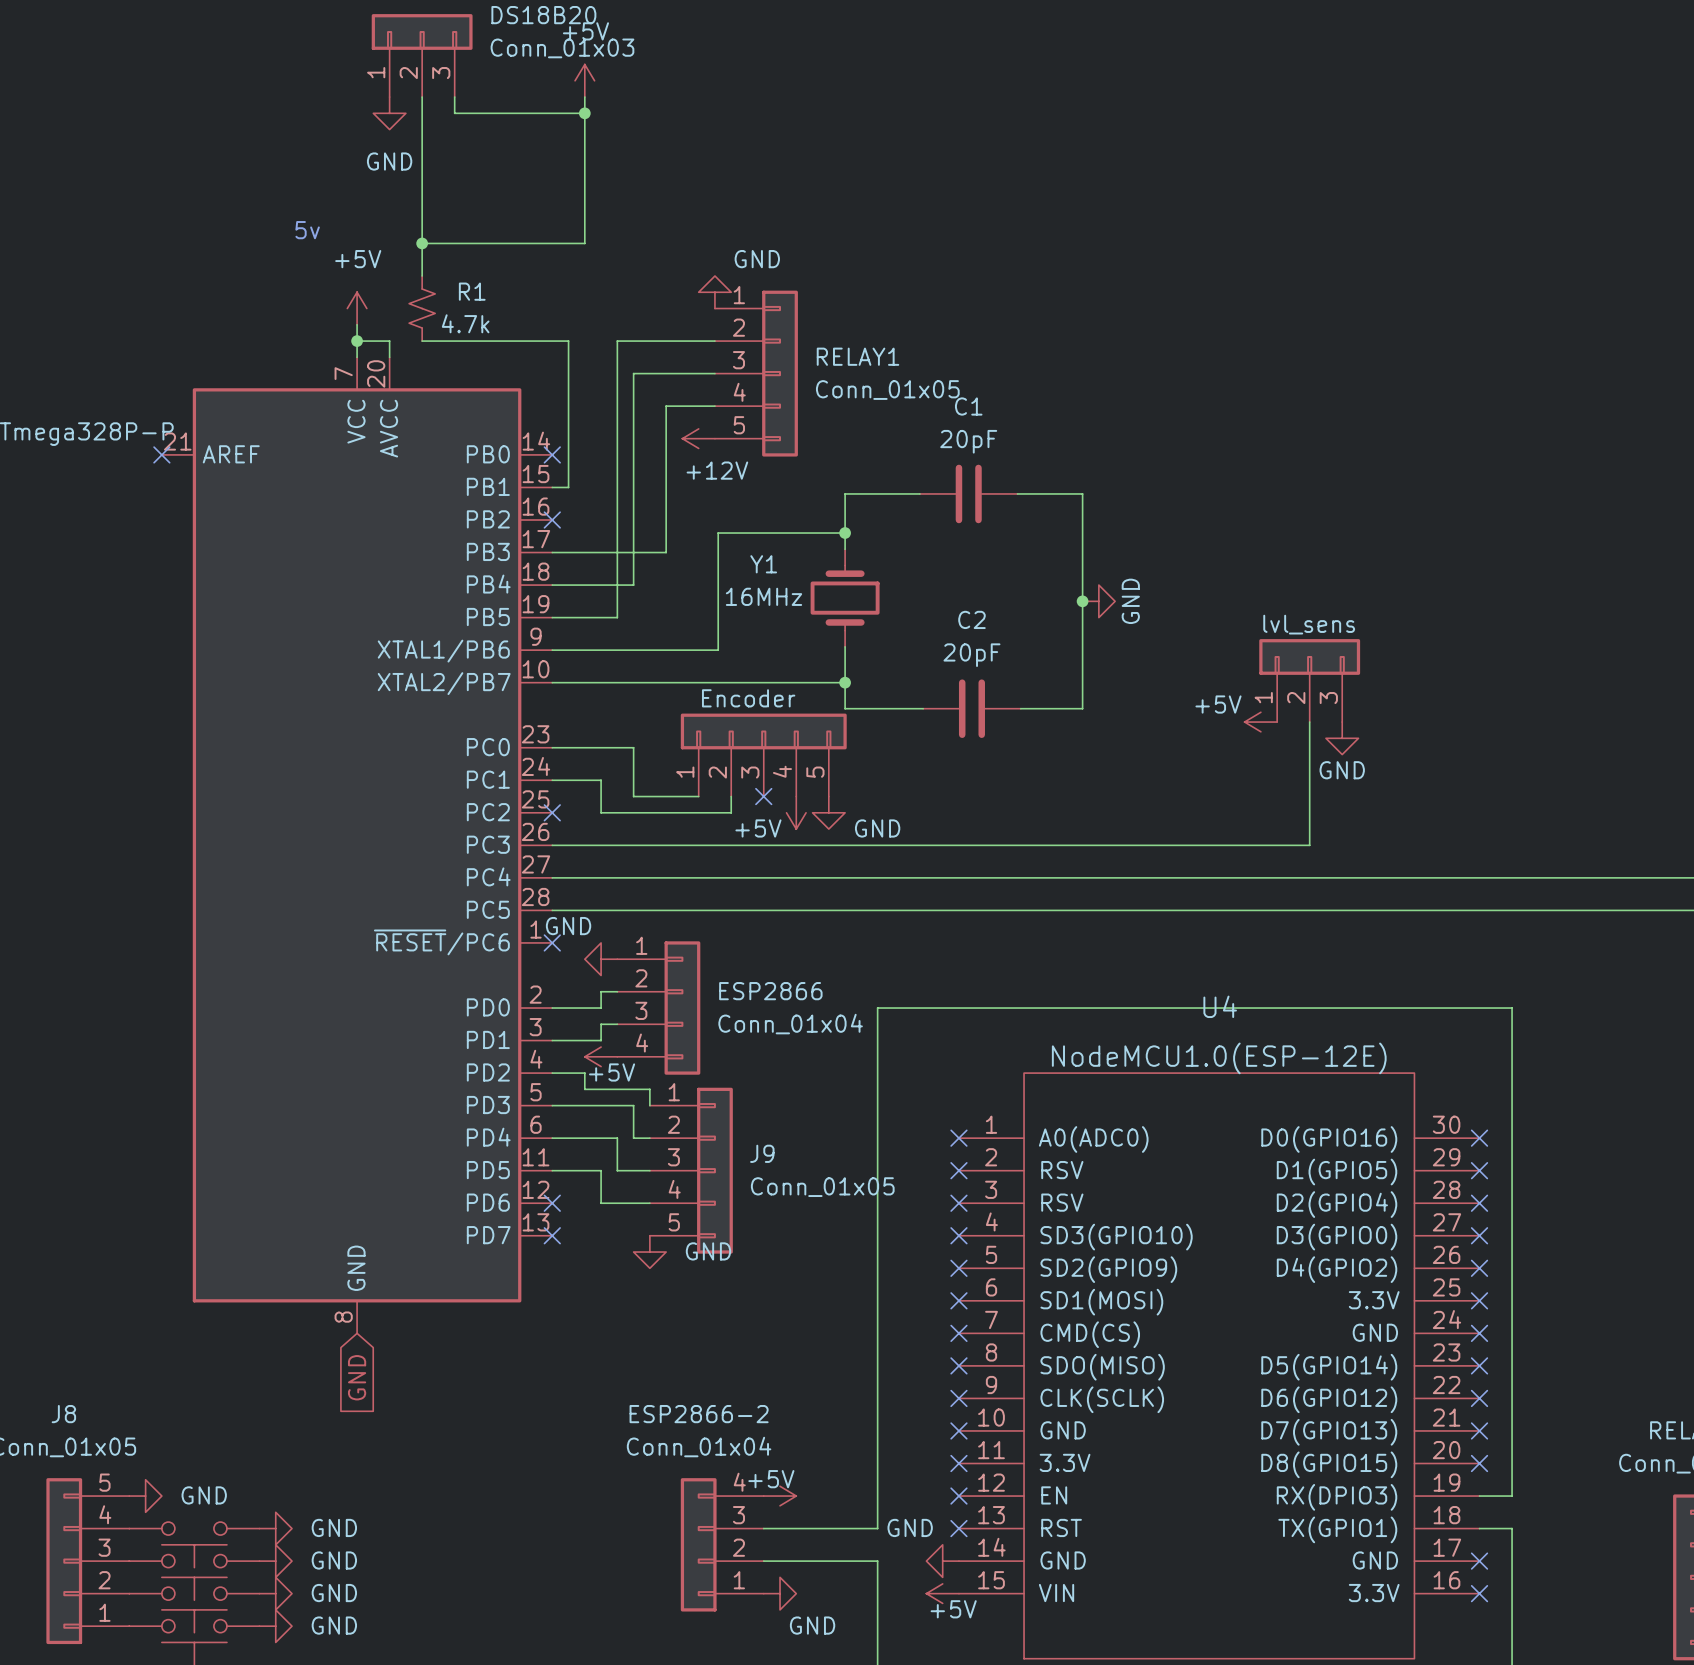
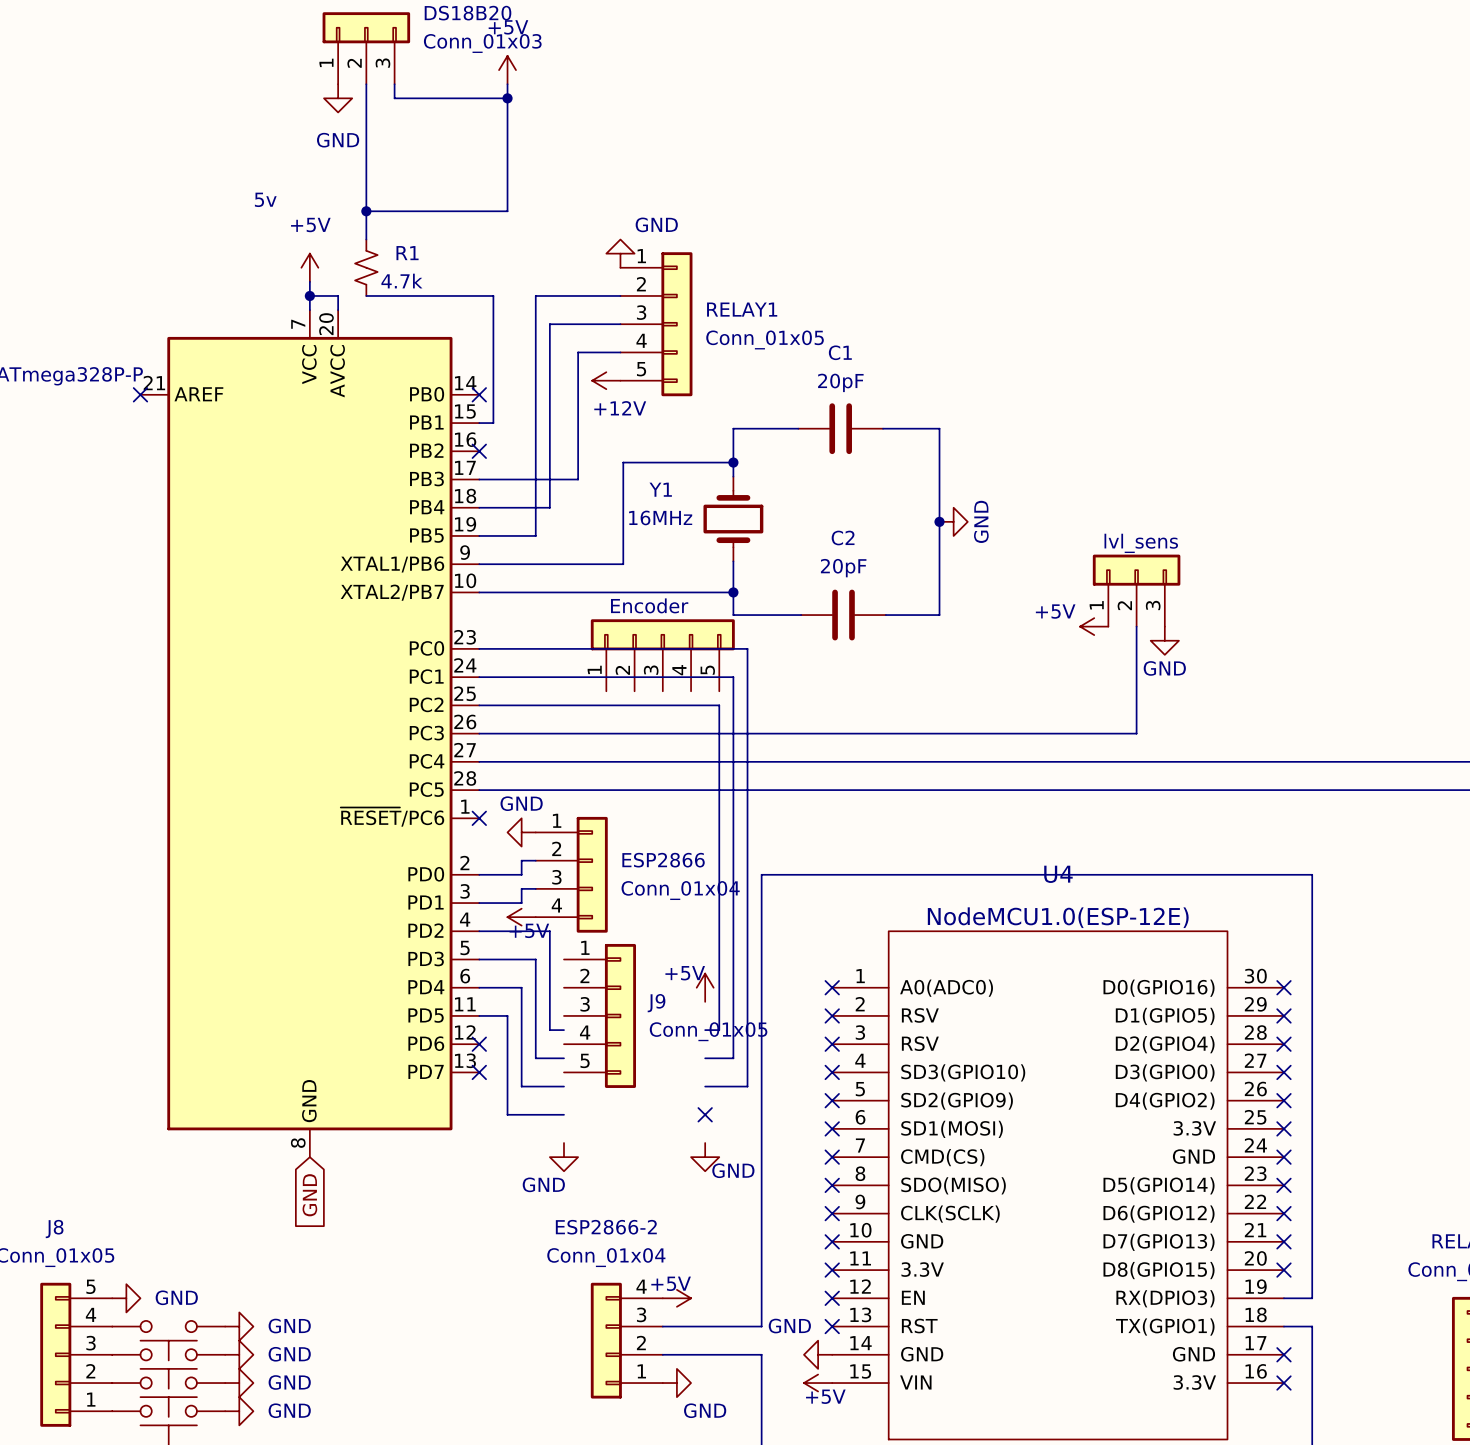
wire: (633, 747) (633, 796) (698, 796) -> (549, 648) (747, 648) (747, 1086) (705, 1086)
wire: (601, 780) (601, 812) -> (479, 705) (521, 705)
wire: none -> (521, 677) (733, 677) (733, 1058) (705, 1058)
wire: (731, 796) (731, 812) -> (705, 1030) (719, 1030) (719, 705) (634, 705)
no-connect mark: (763, 796) -> none
no-connect mark: (552, 812) -> none
power symbol: +5V (796, 812) -> none
power symbol: GND (828, 812) -> none
power symbol text position: GND (568, 926) -> GND (521, 803)
wire: (584, 1073) (584, 1089) (649, 1089) (649, 1105) -> (507, 931) (549, 931) (549, 959)
wire: (617, 1105) (633, 1105) -> (535, 959) (535, 987)
wire: (601, 1138) (617, 1138) -> (521, 987) (521, 1015)
wire: (633, 1138) (649, 1138) -> (549, 987) (549, 1030) (563, 1030)
power symbol: none -> +5V (705, 987)
wire: (584, 1170) (601, 1170) -> (507, 1015) (507, 1114) (563, 1114)
wire: (617, 1170) (649, 1170) -> (535, 1015) (535, 1058) (563, 1058)
wire: (601, 1203) (649, 1203) -> (521, 1044) (521, 1086) (563, 1086)
power symbol text position: GND (708, 1251) -> GND (543, 1184)
power symbol position: GND (649, 1252) -> GND (563, 1157)
no-connect mark: none -> (705, 1114)
power symbol: none -> GND (705, 1157)

